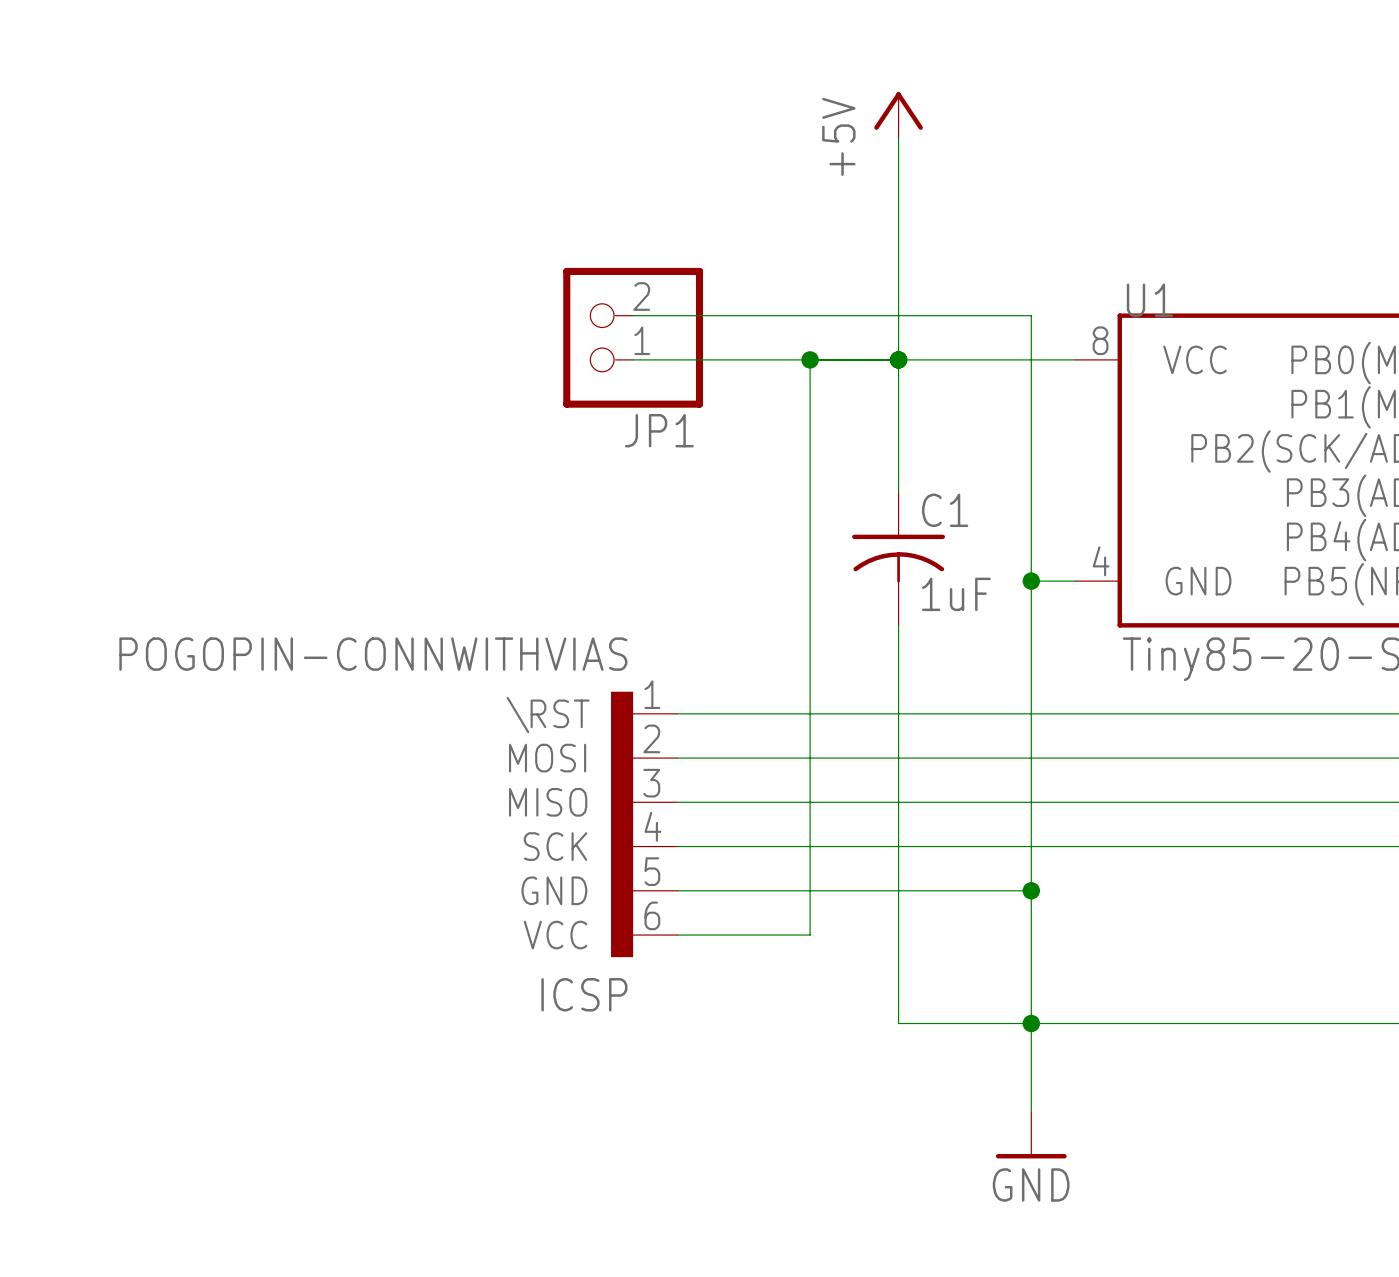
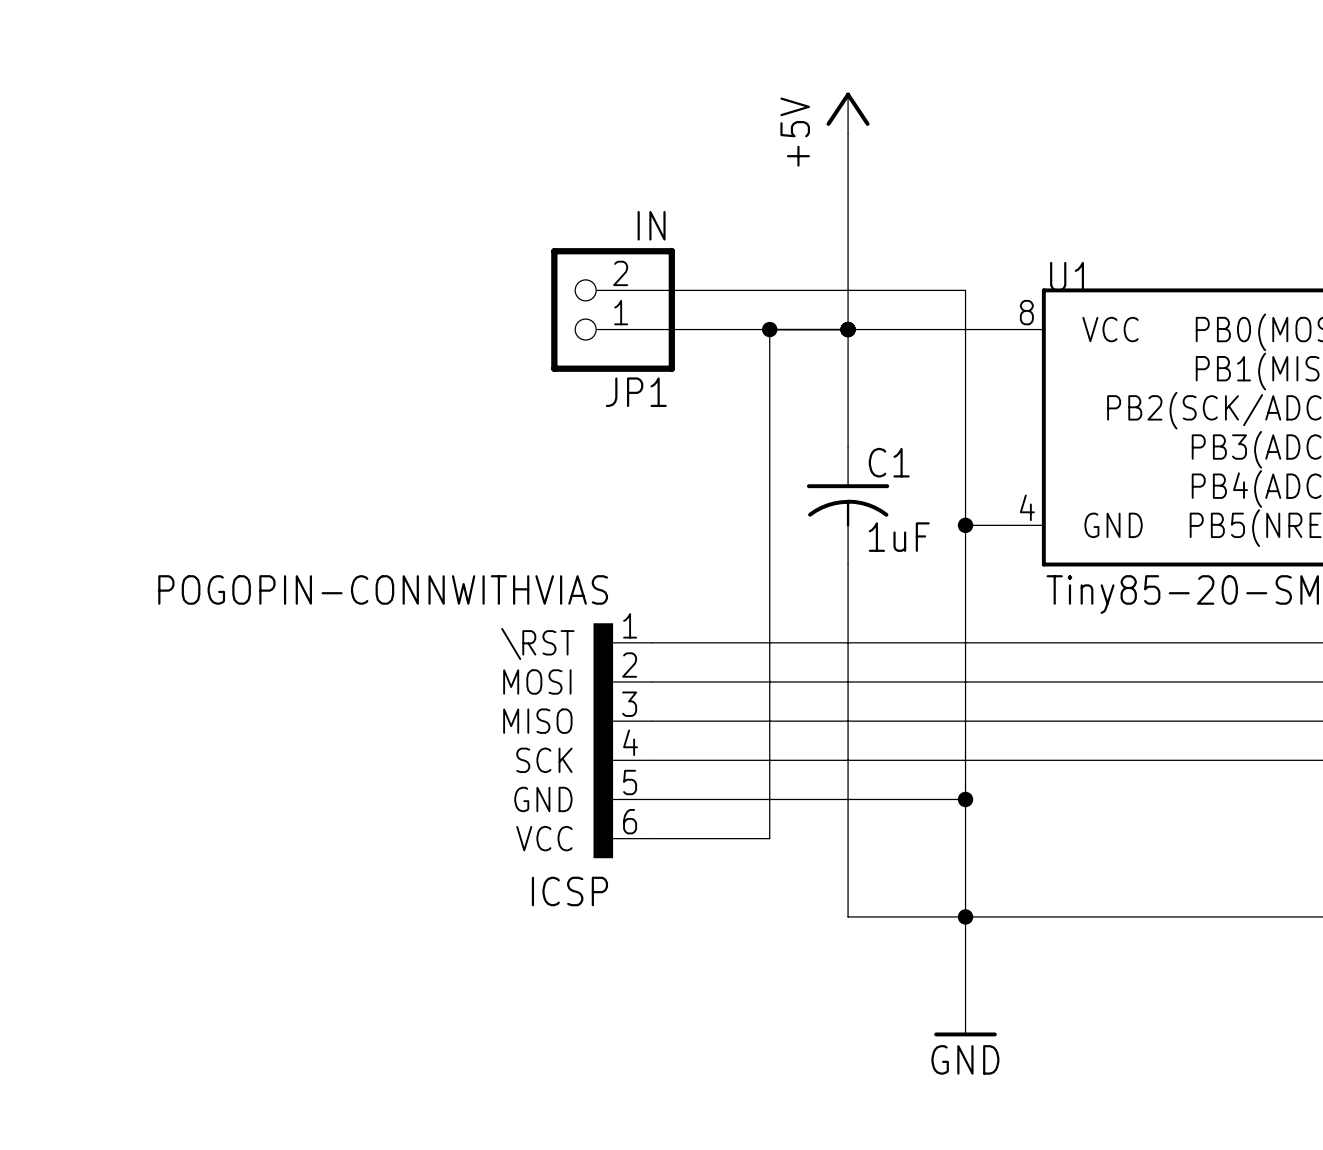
JP1 value: none -> IN (651, 225)

